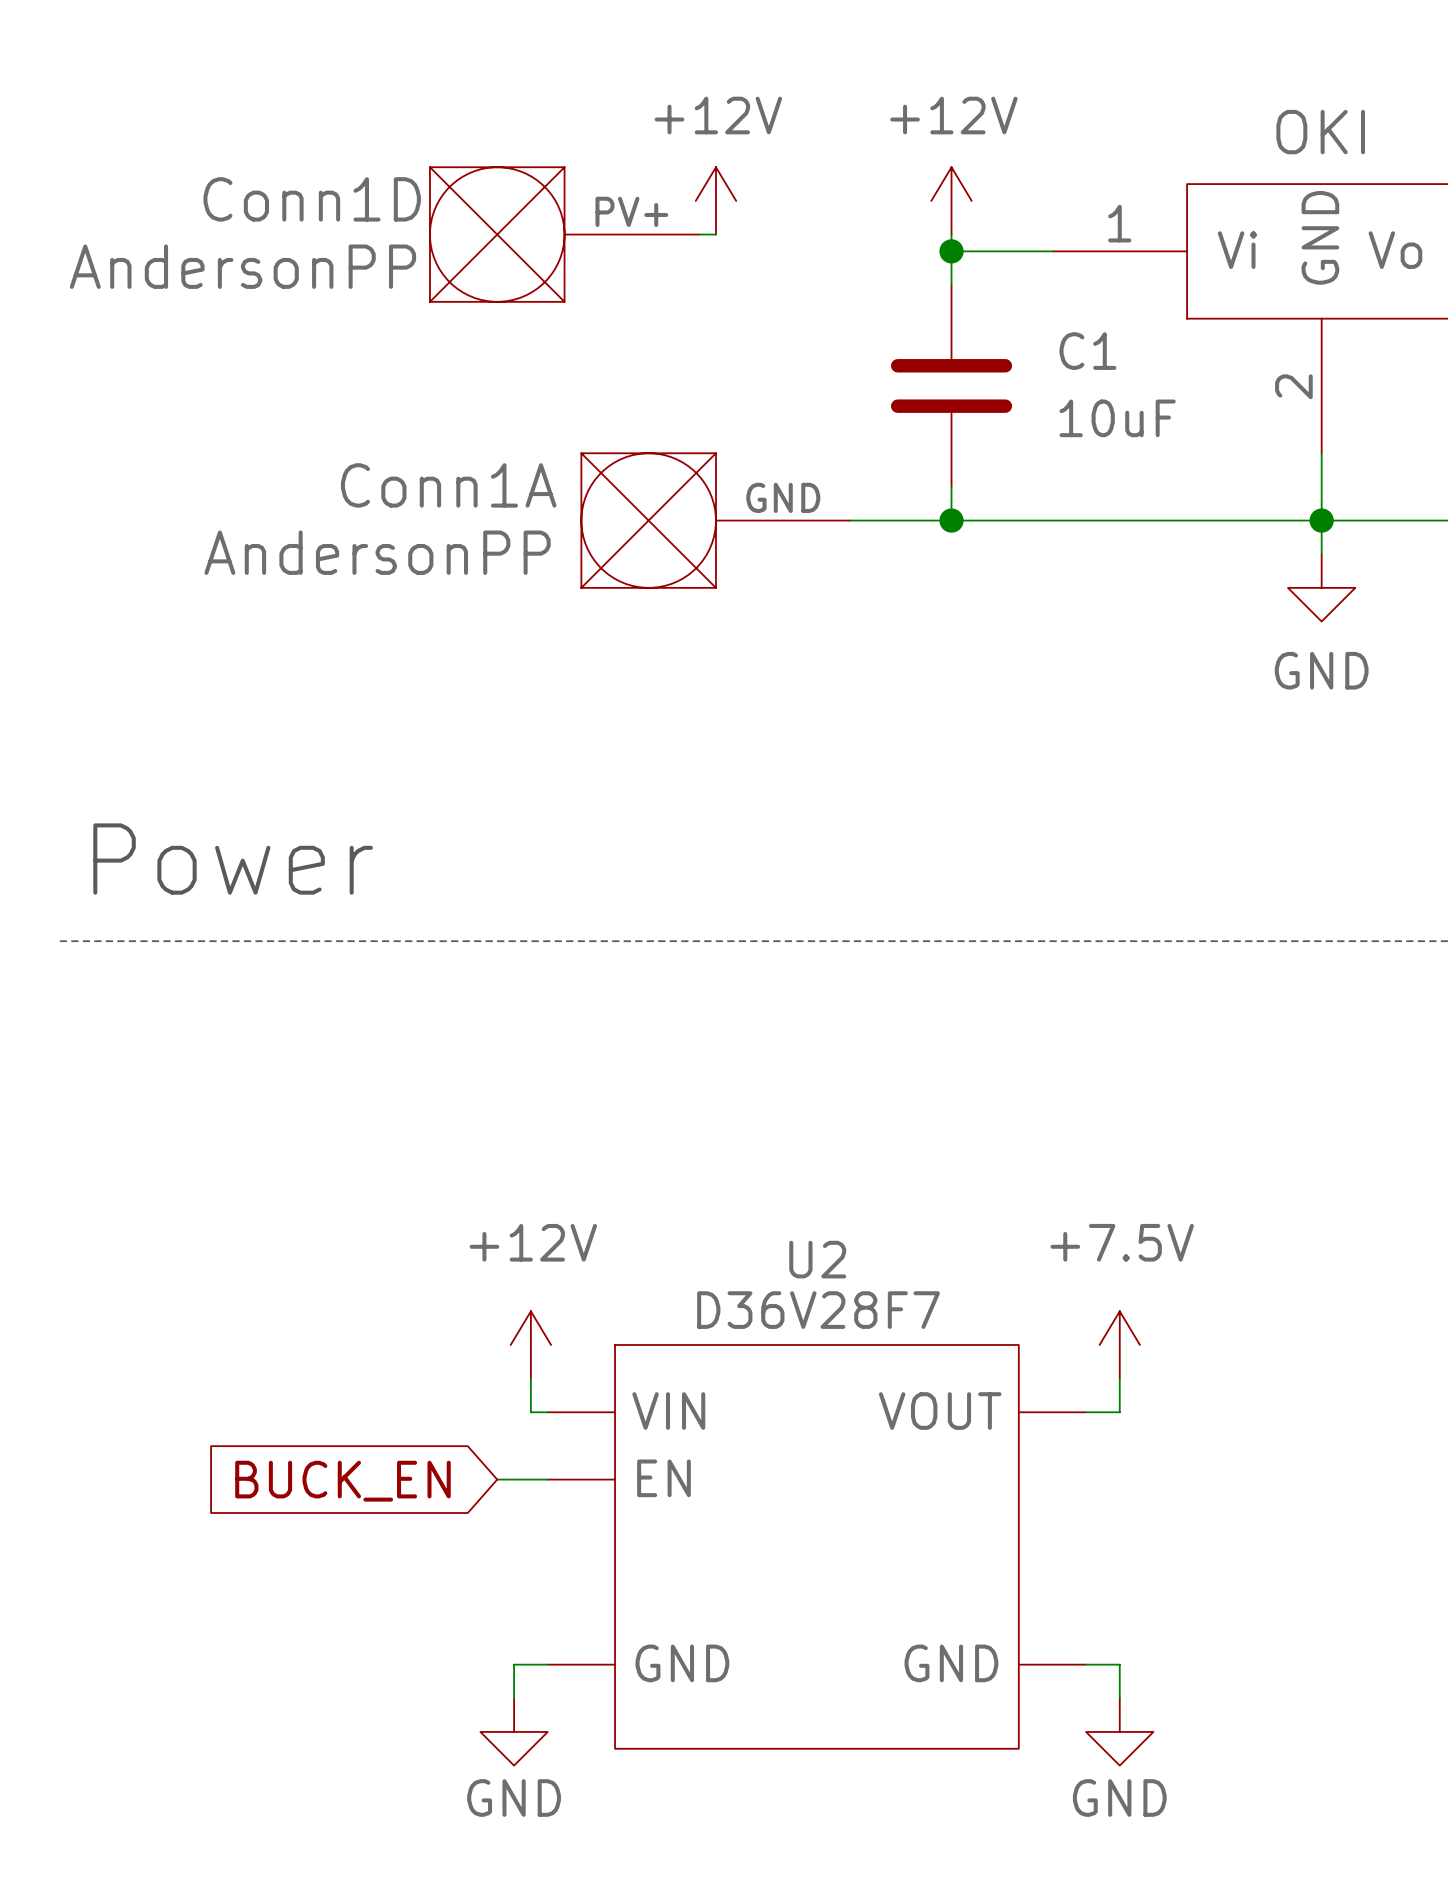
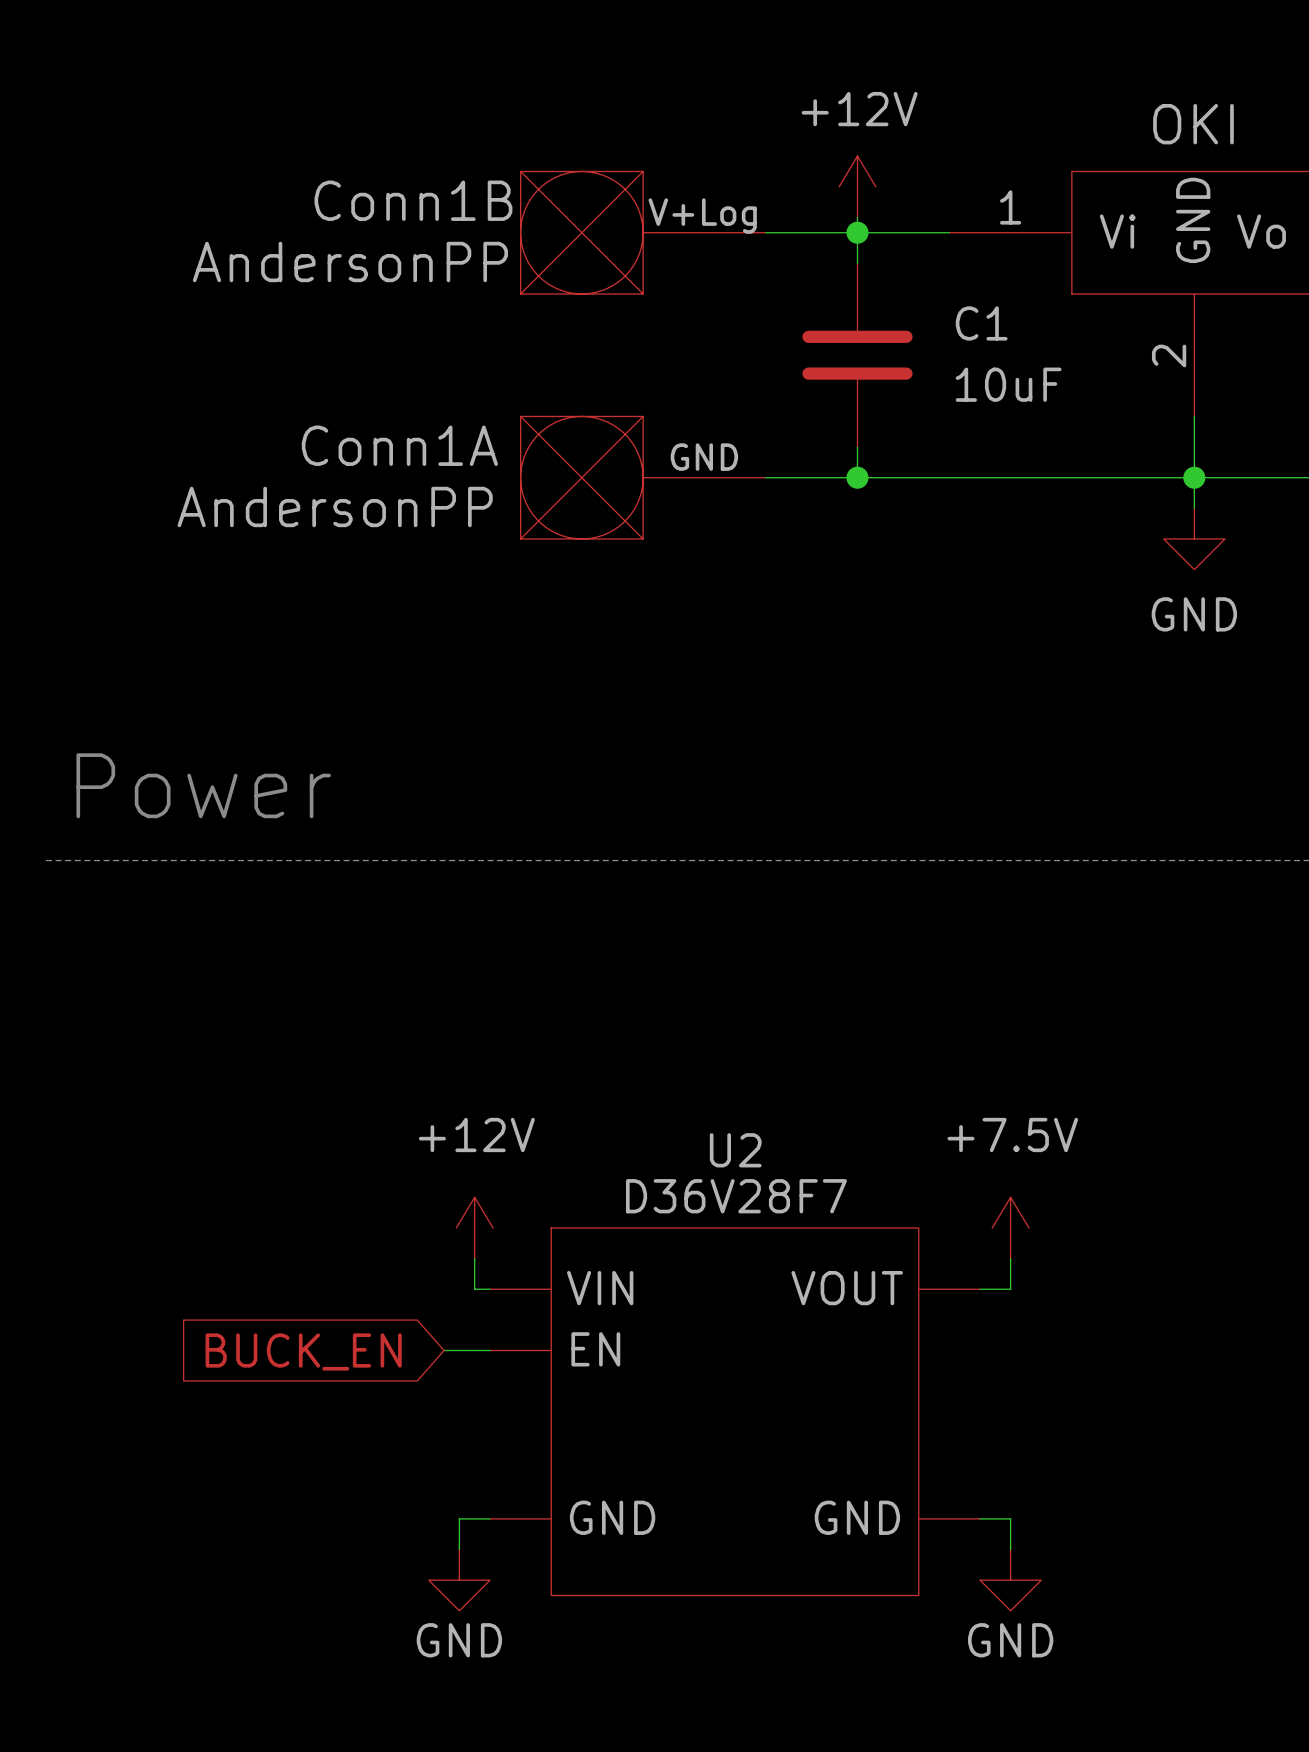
power symbol: +12V (715, 200) -> none
Conn1D: AndersonPP (564, 234) -> none
wire: (699, 234) (715, 234) -> none
Conn1B: none -> AndersonPP (643, 232)
wire: none -> (765, 232) (857, 232)

